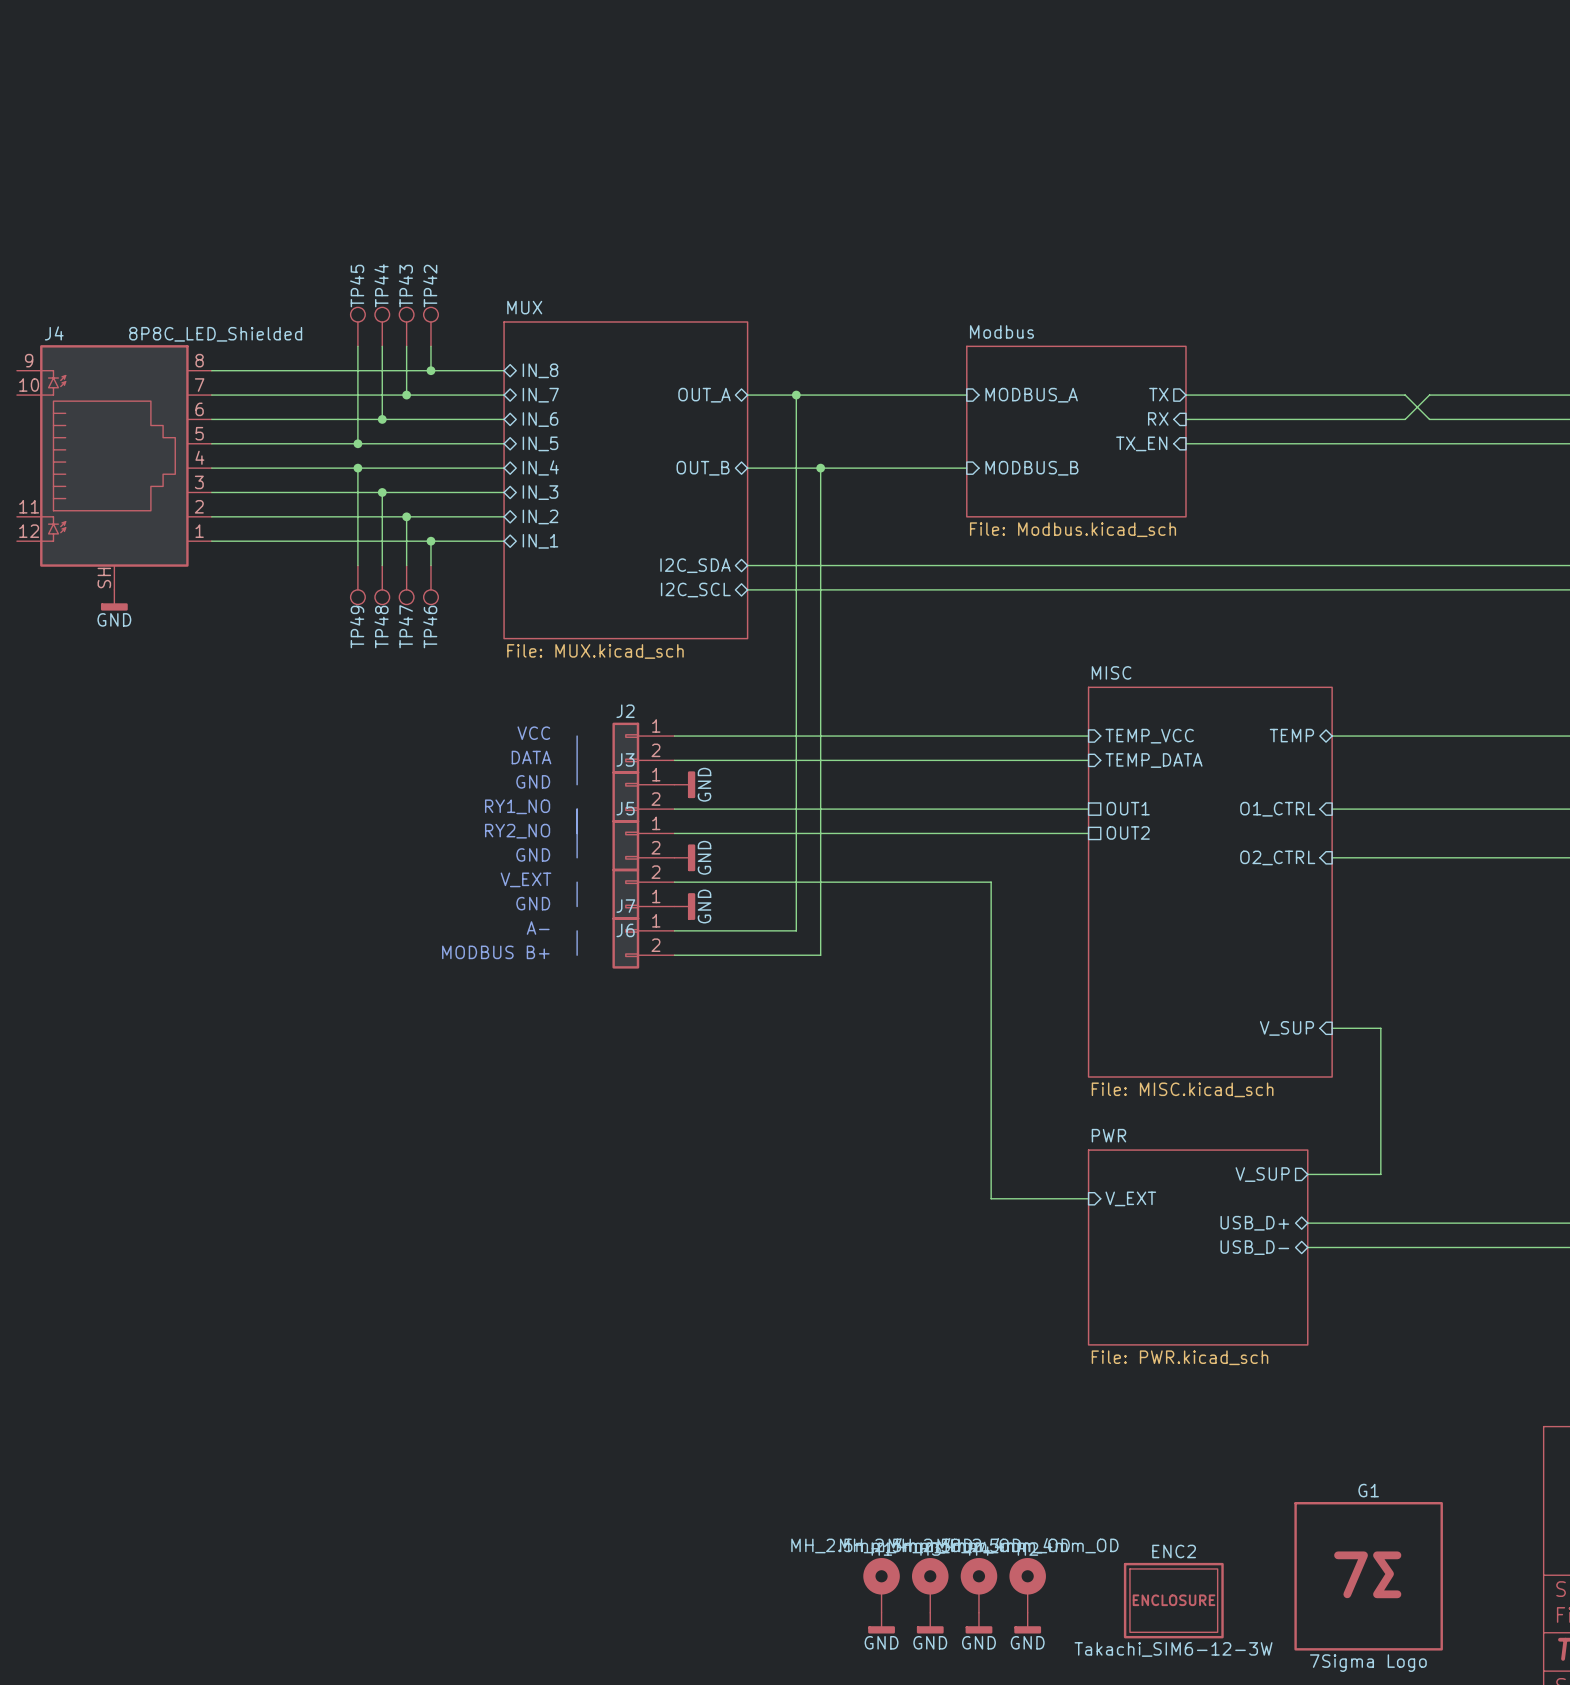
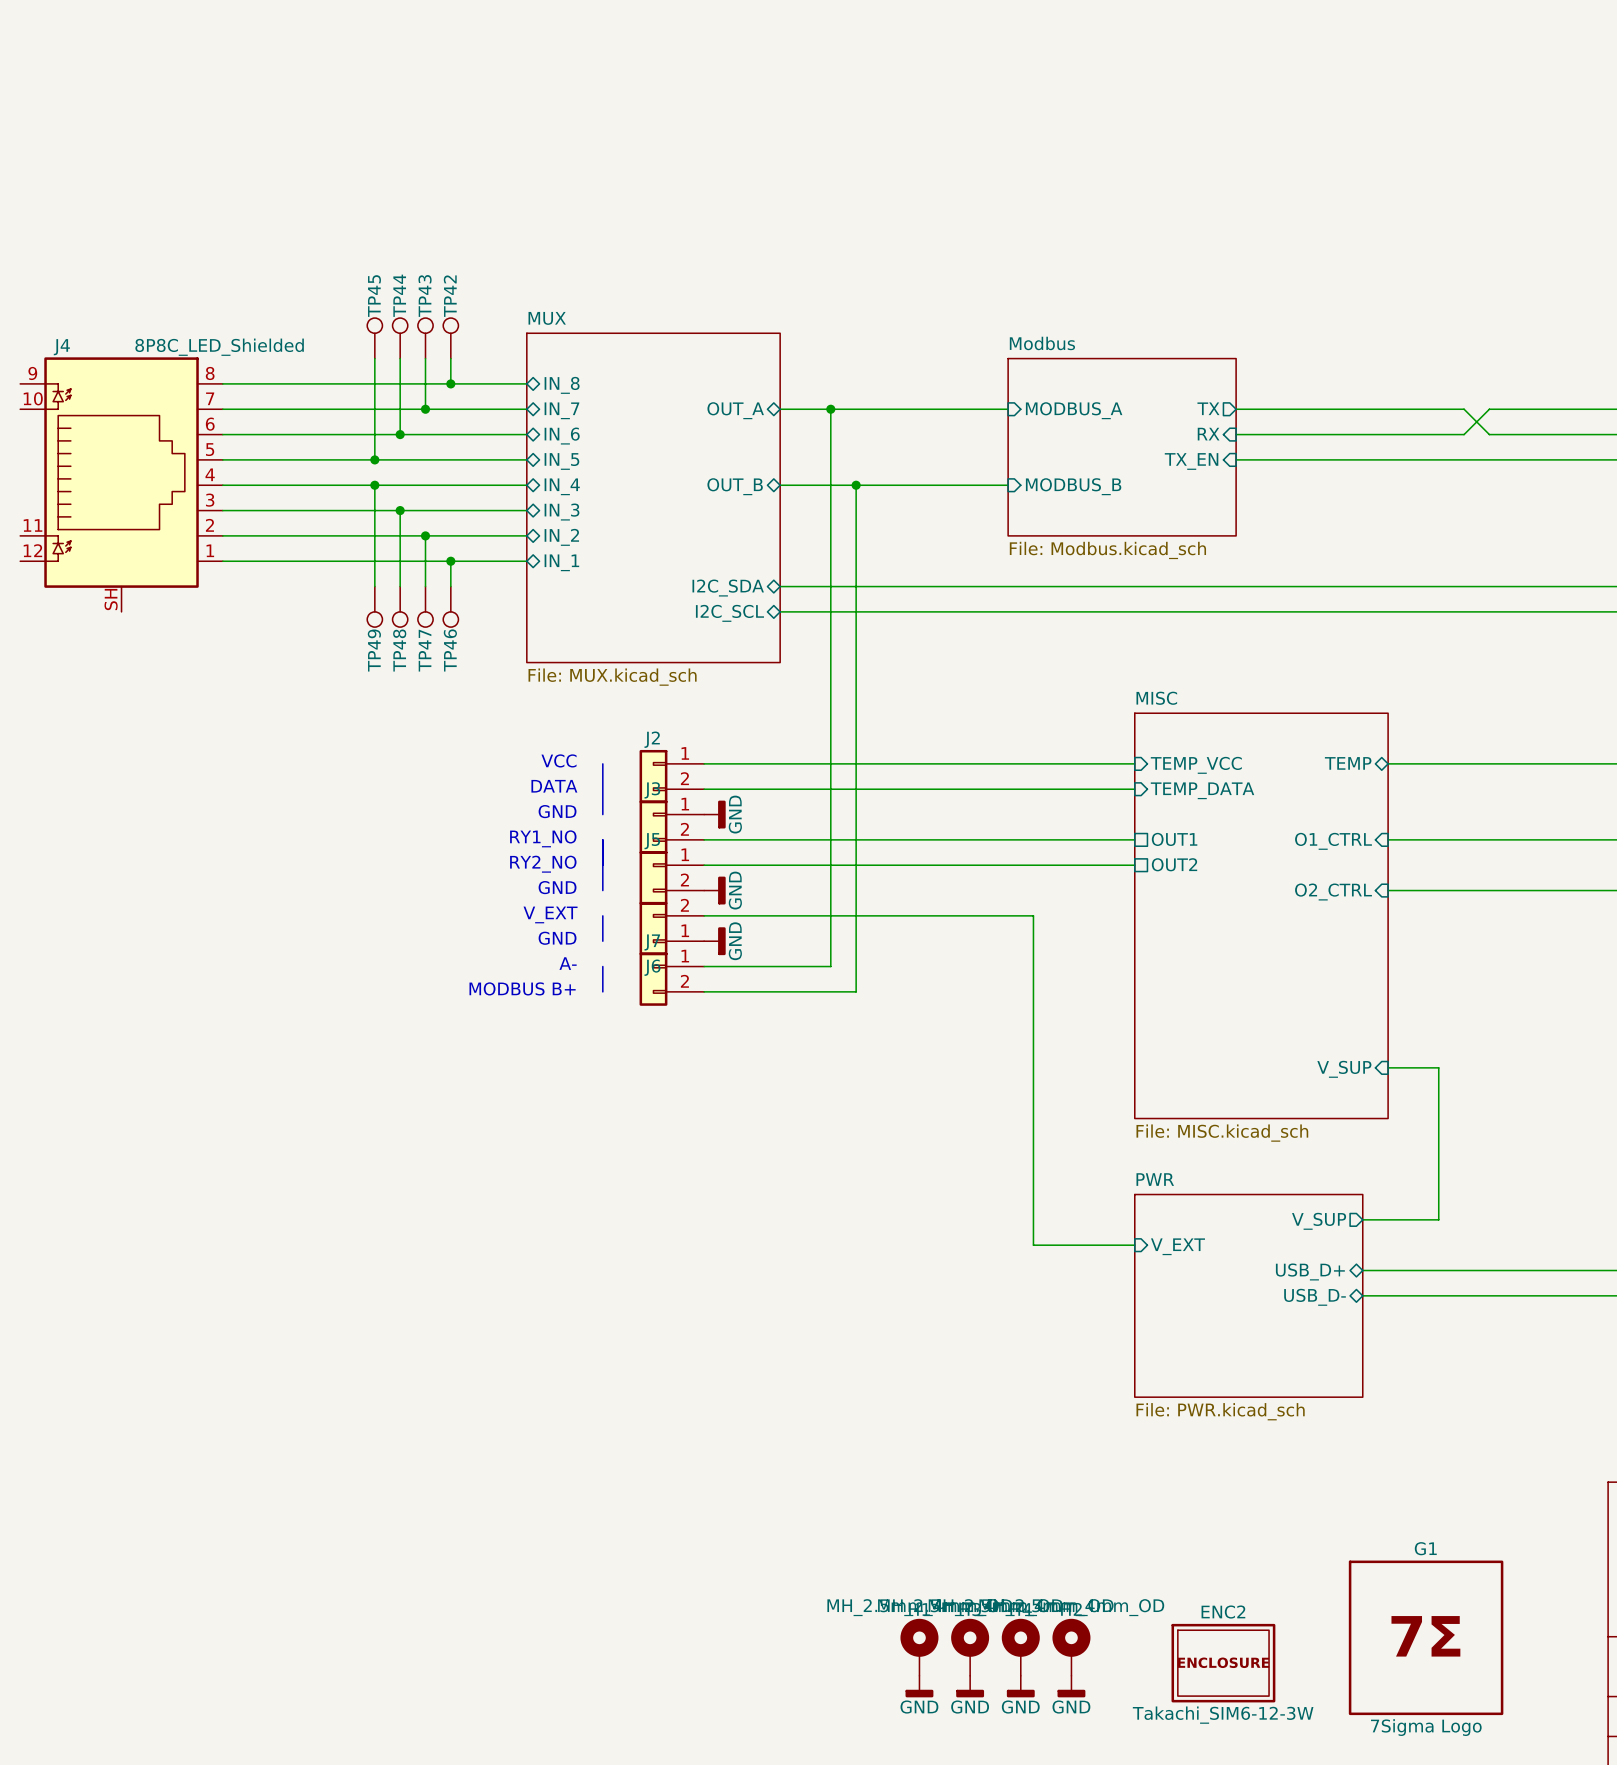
power symbol: GND (114, 600) -> none

